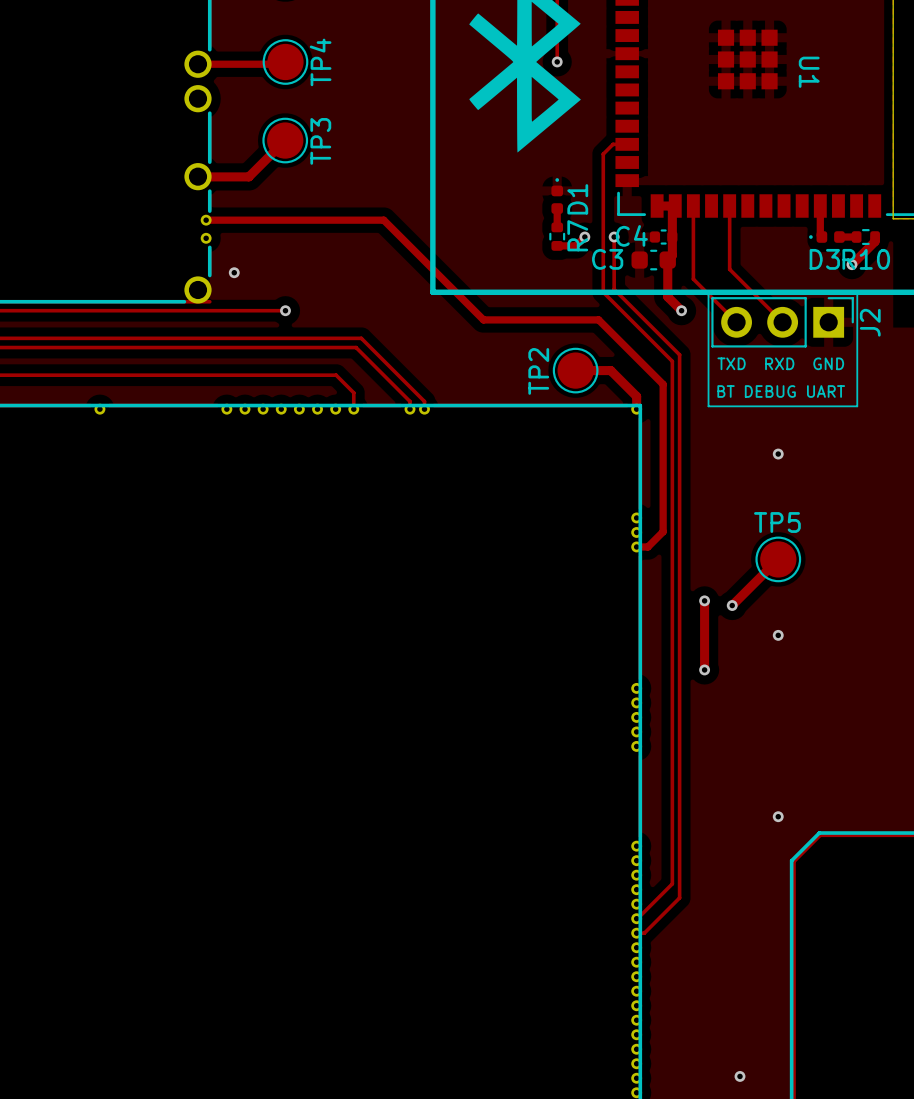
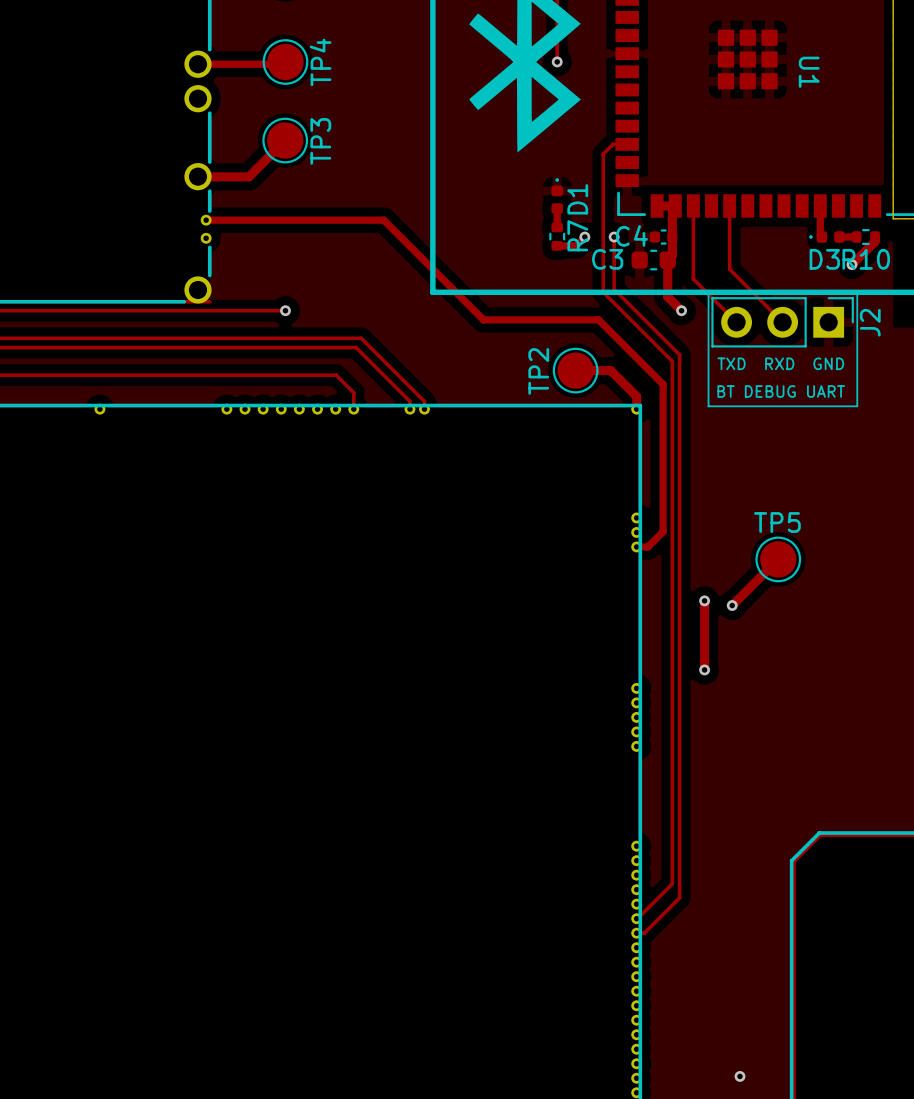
via: (234, 272) -> none
via: (778, 454) -> none
via: (778, 635) -> none
via: (778, 816) -> none

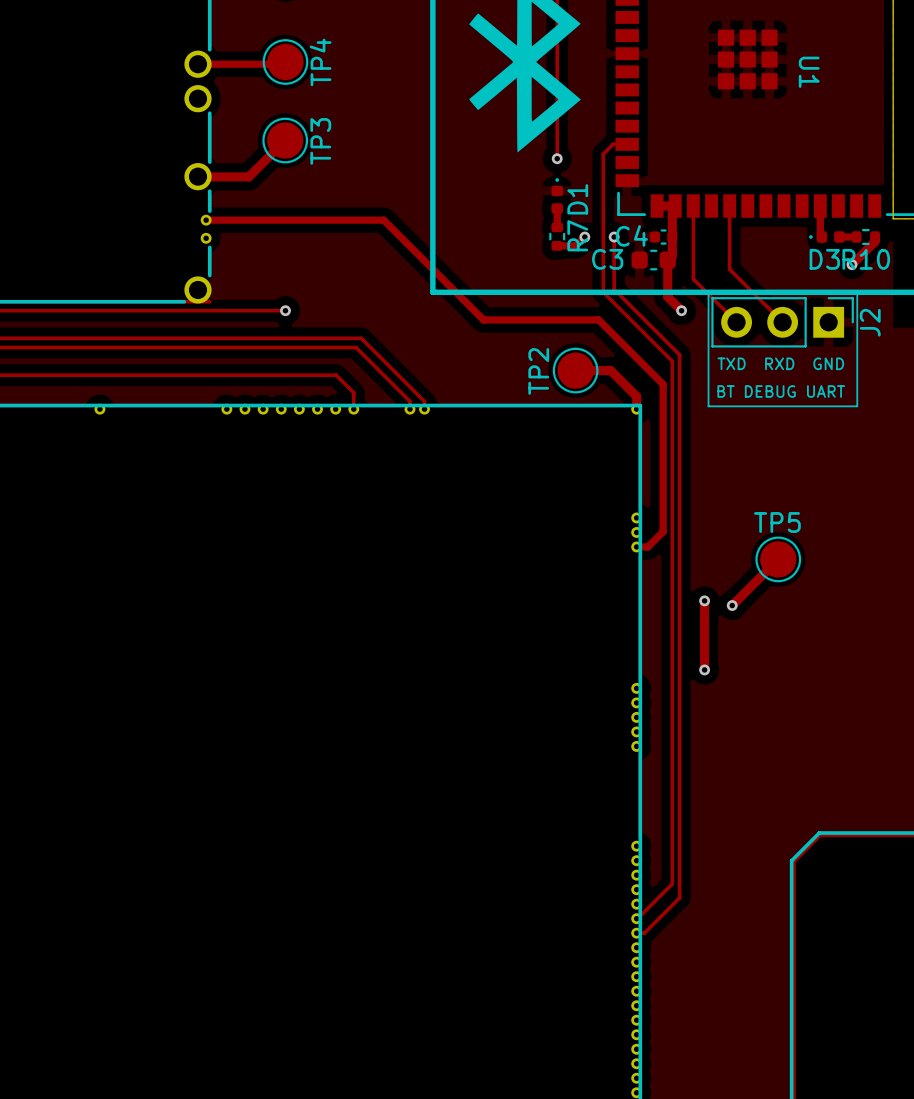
track: none -> (557, 61) (557, 158)
via position: (557, 61) -> (557, 158)
via: (739, 1076) -> none

